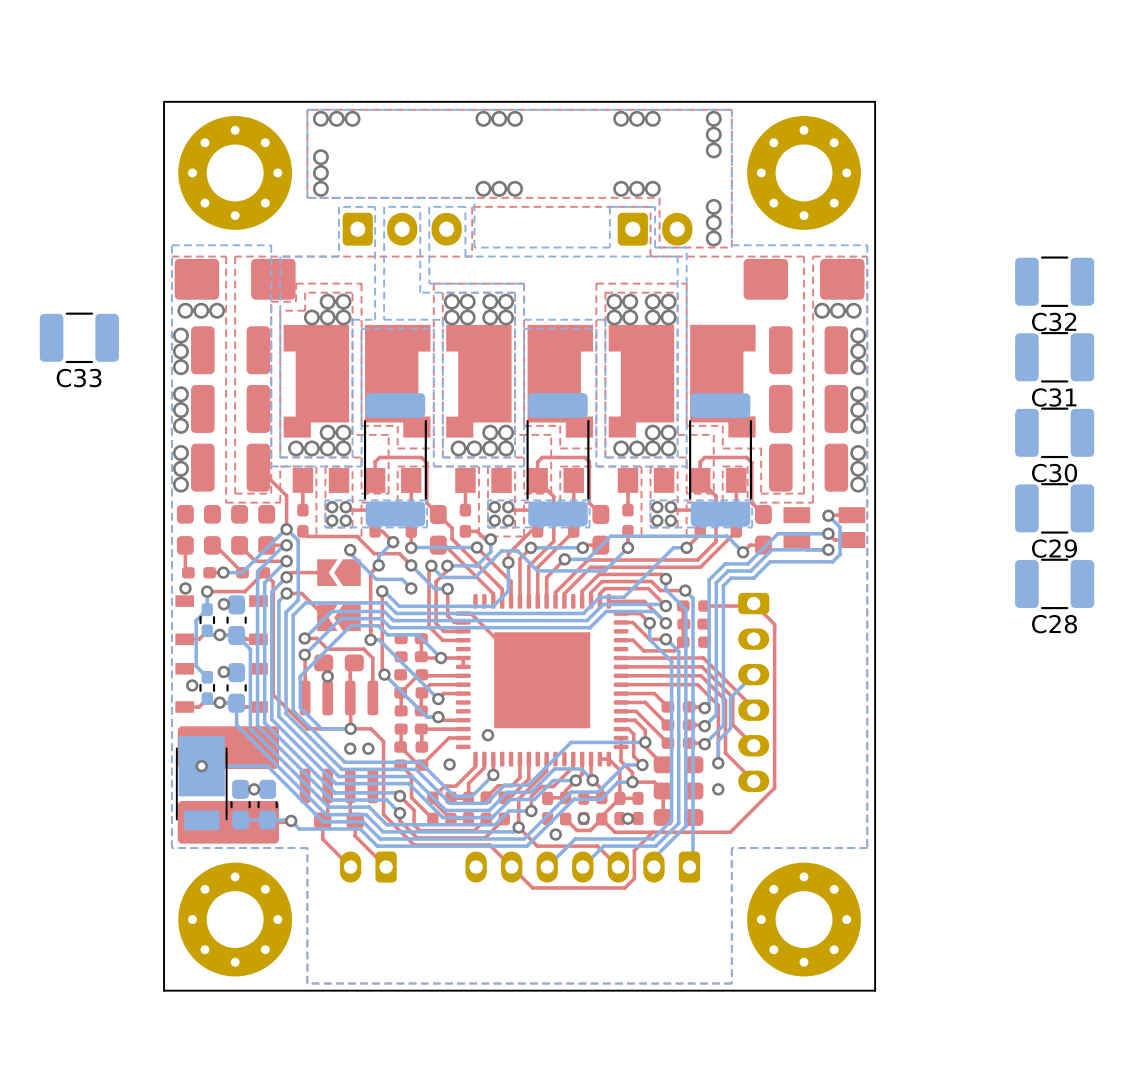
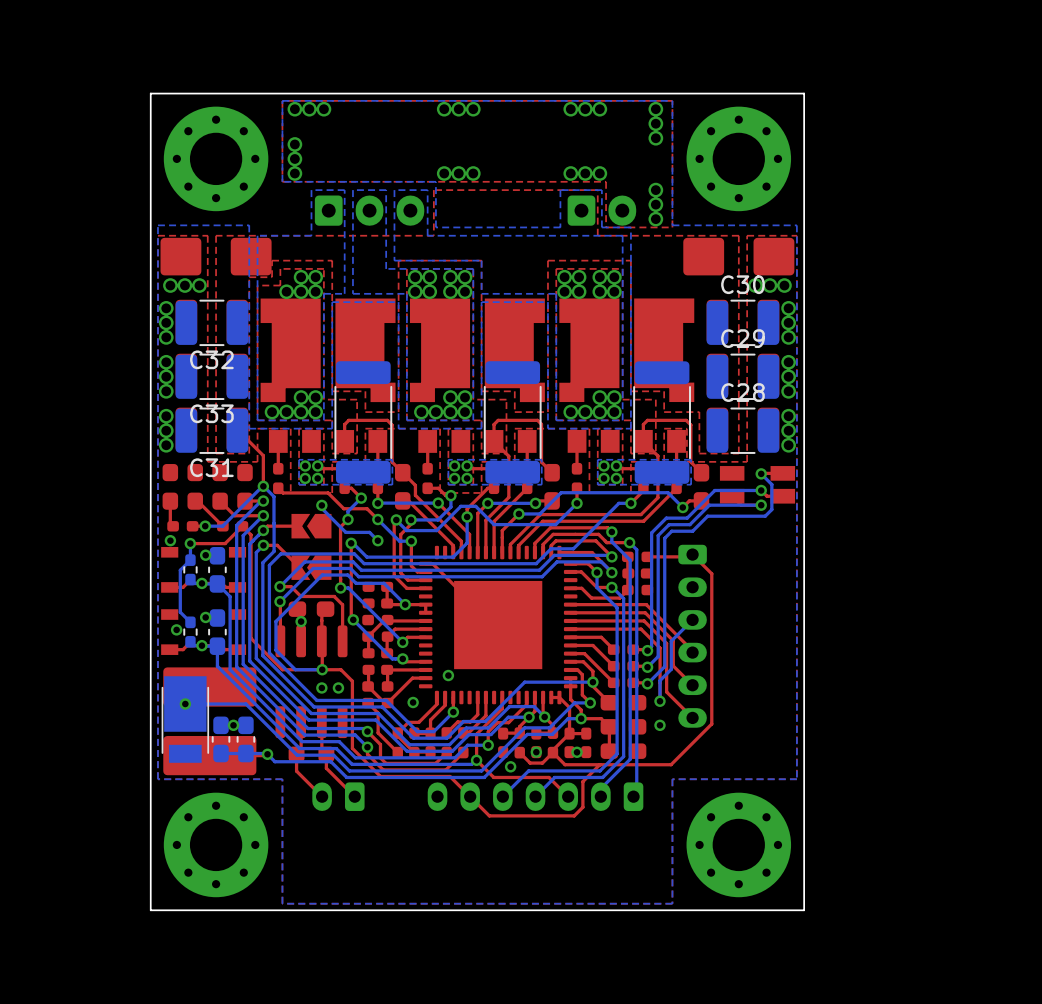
C32 position: (1054, 281) -> (211, 322)
C33 position: (79, 337) -> (211, 376)
C31 position: (1054, 357) -> (211, 430)
C30 position: (1054, 432) -> (742, 322)
C30 name position: C30 (1054, 473) -> C30 (742, 284)
C29 position: (1054, 508) -> (742, 376)
C29 name position: C29 (1054, 548) -> C29 (742, 338)
C28 position: (1054, 583) -> (742, 430)
C28 name position: C28 (1054, 624) -> C28 (742, 392)

